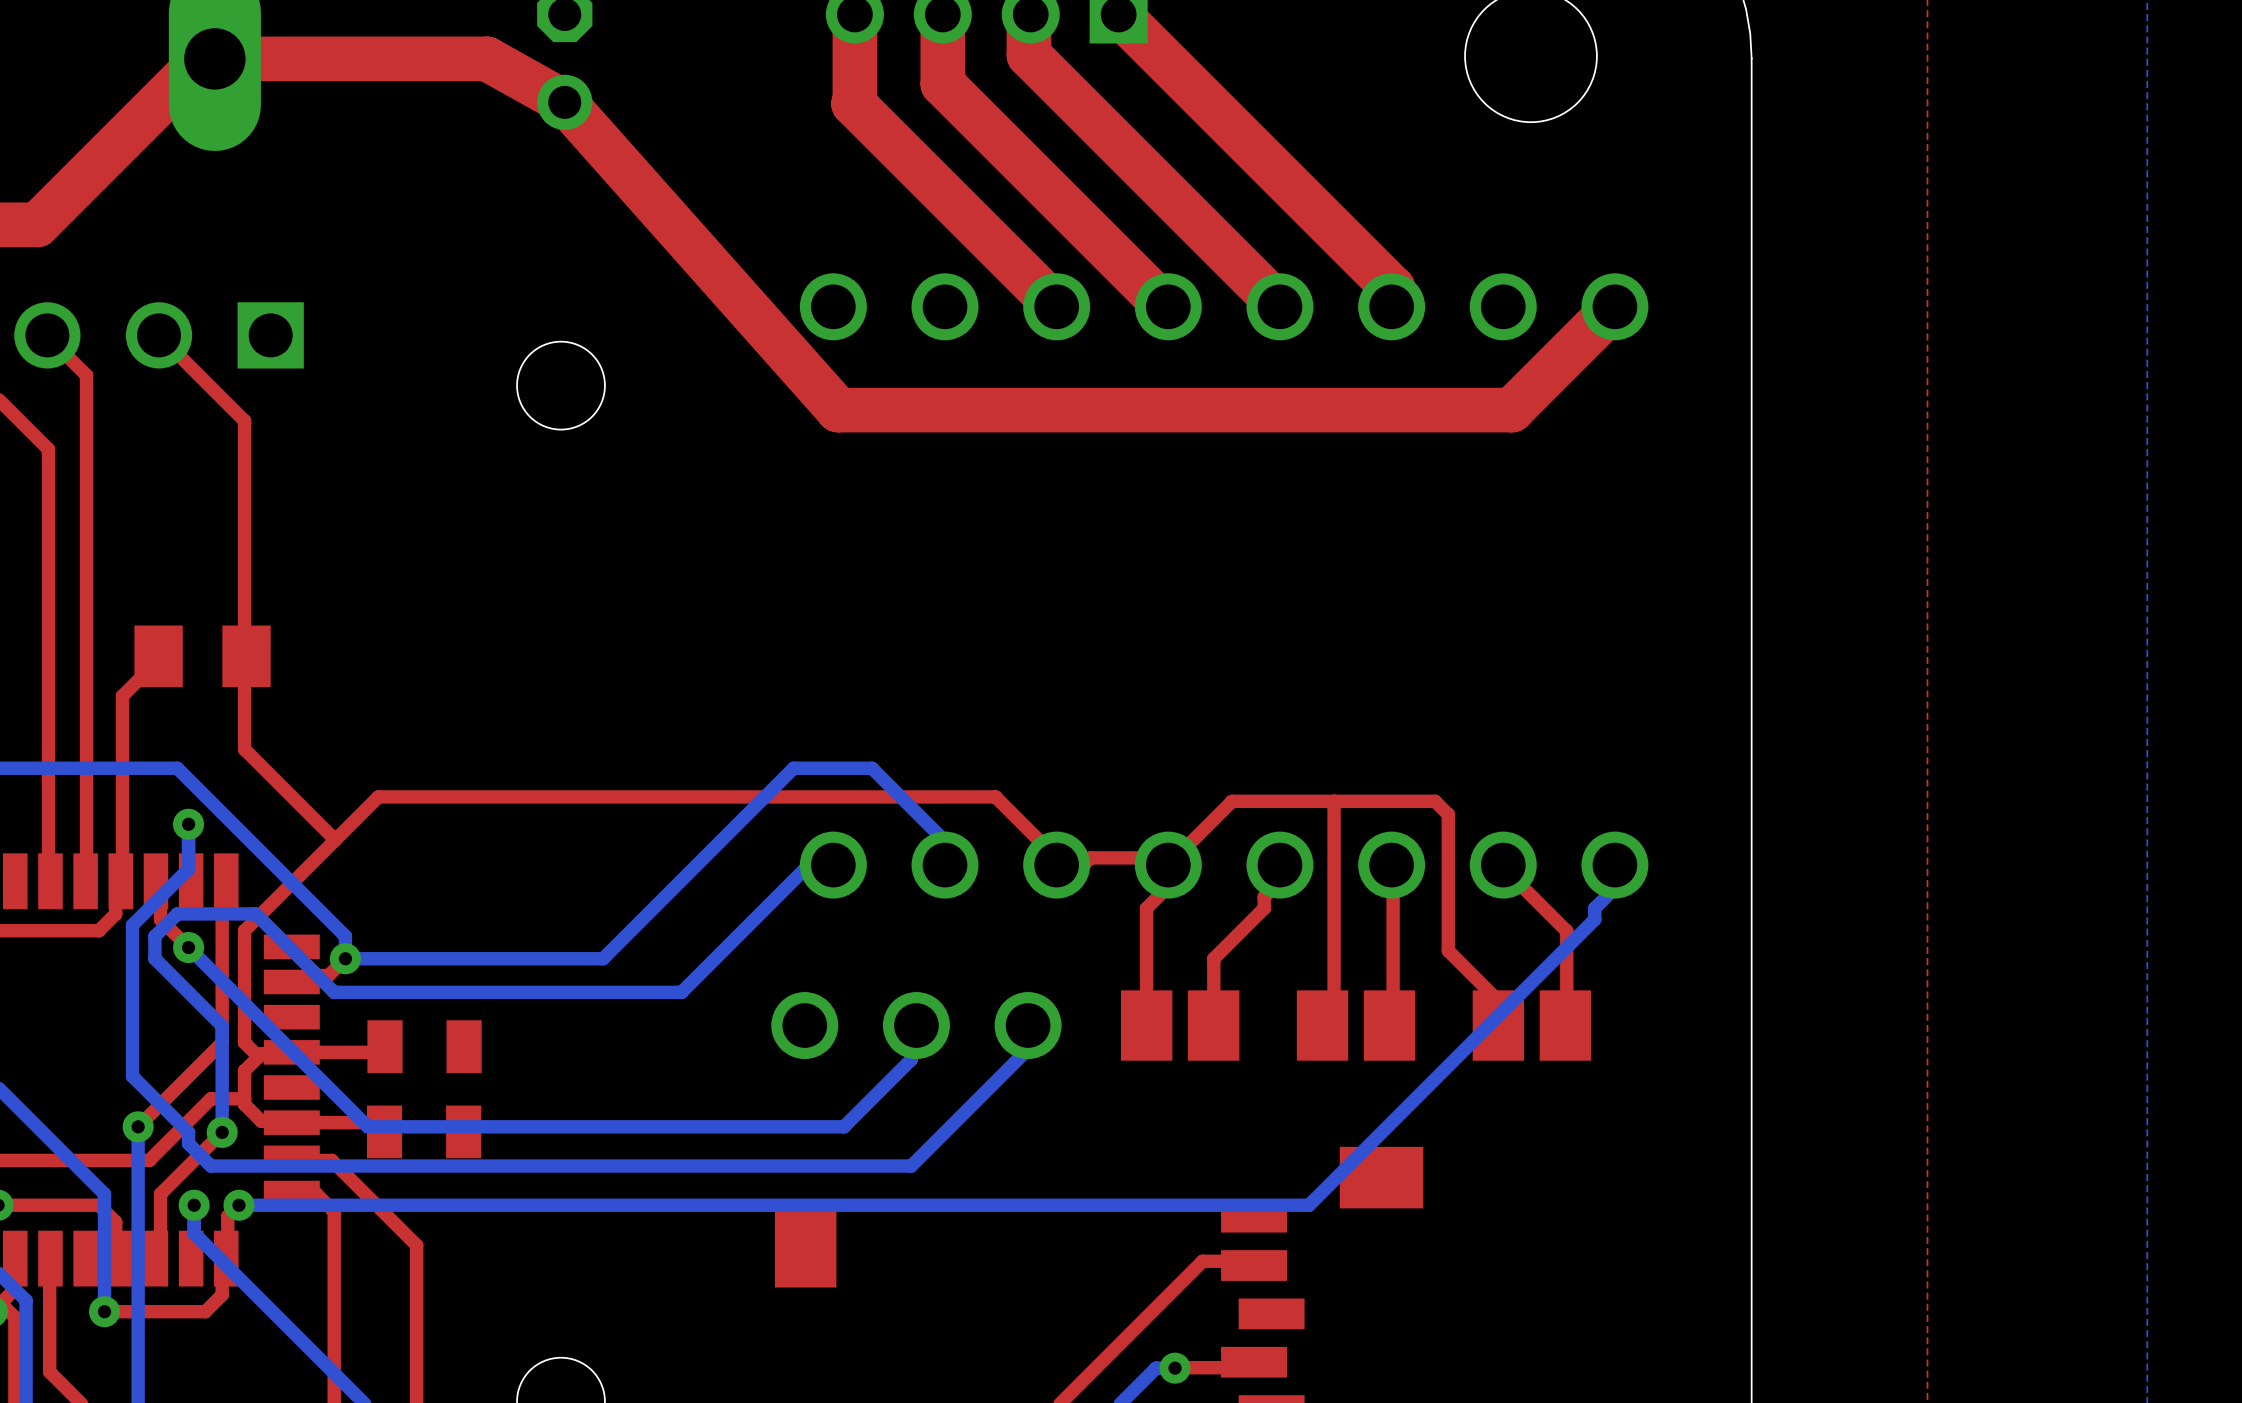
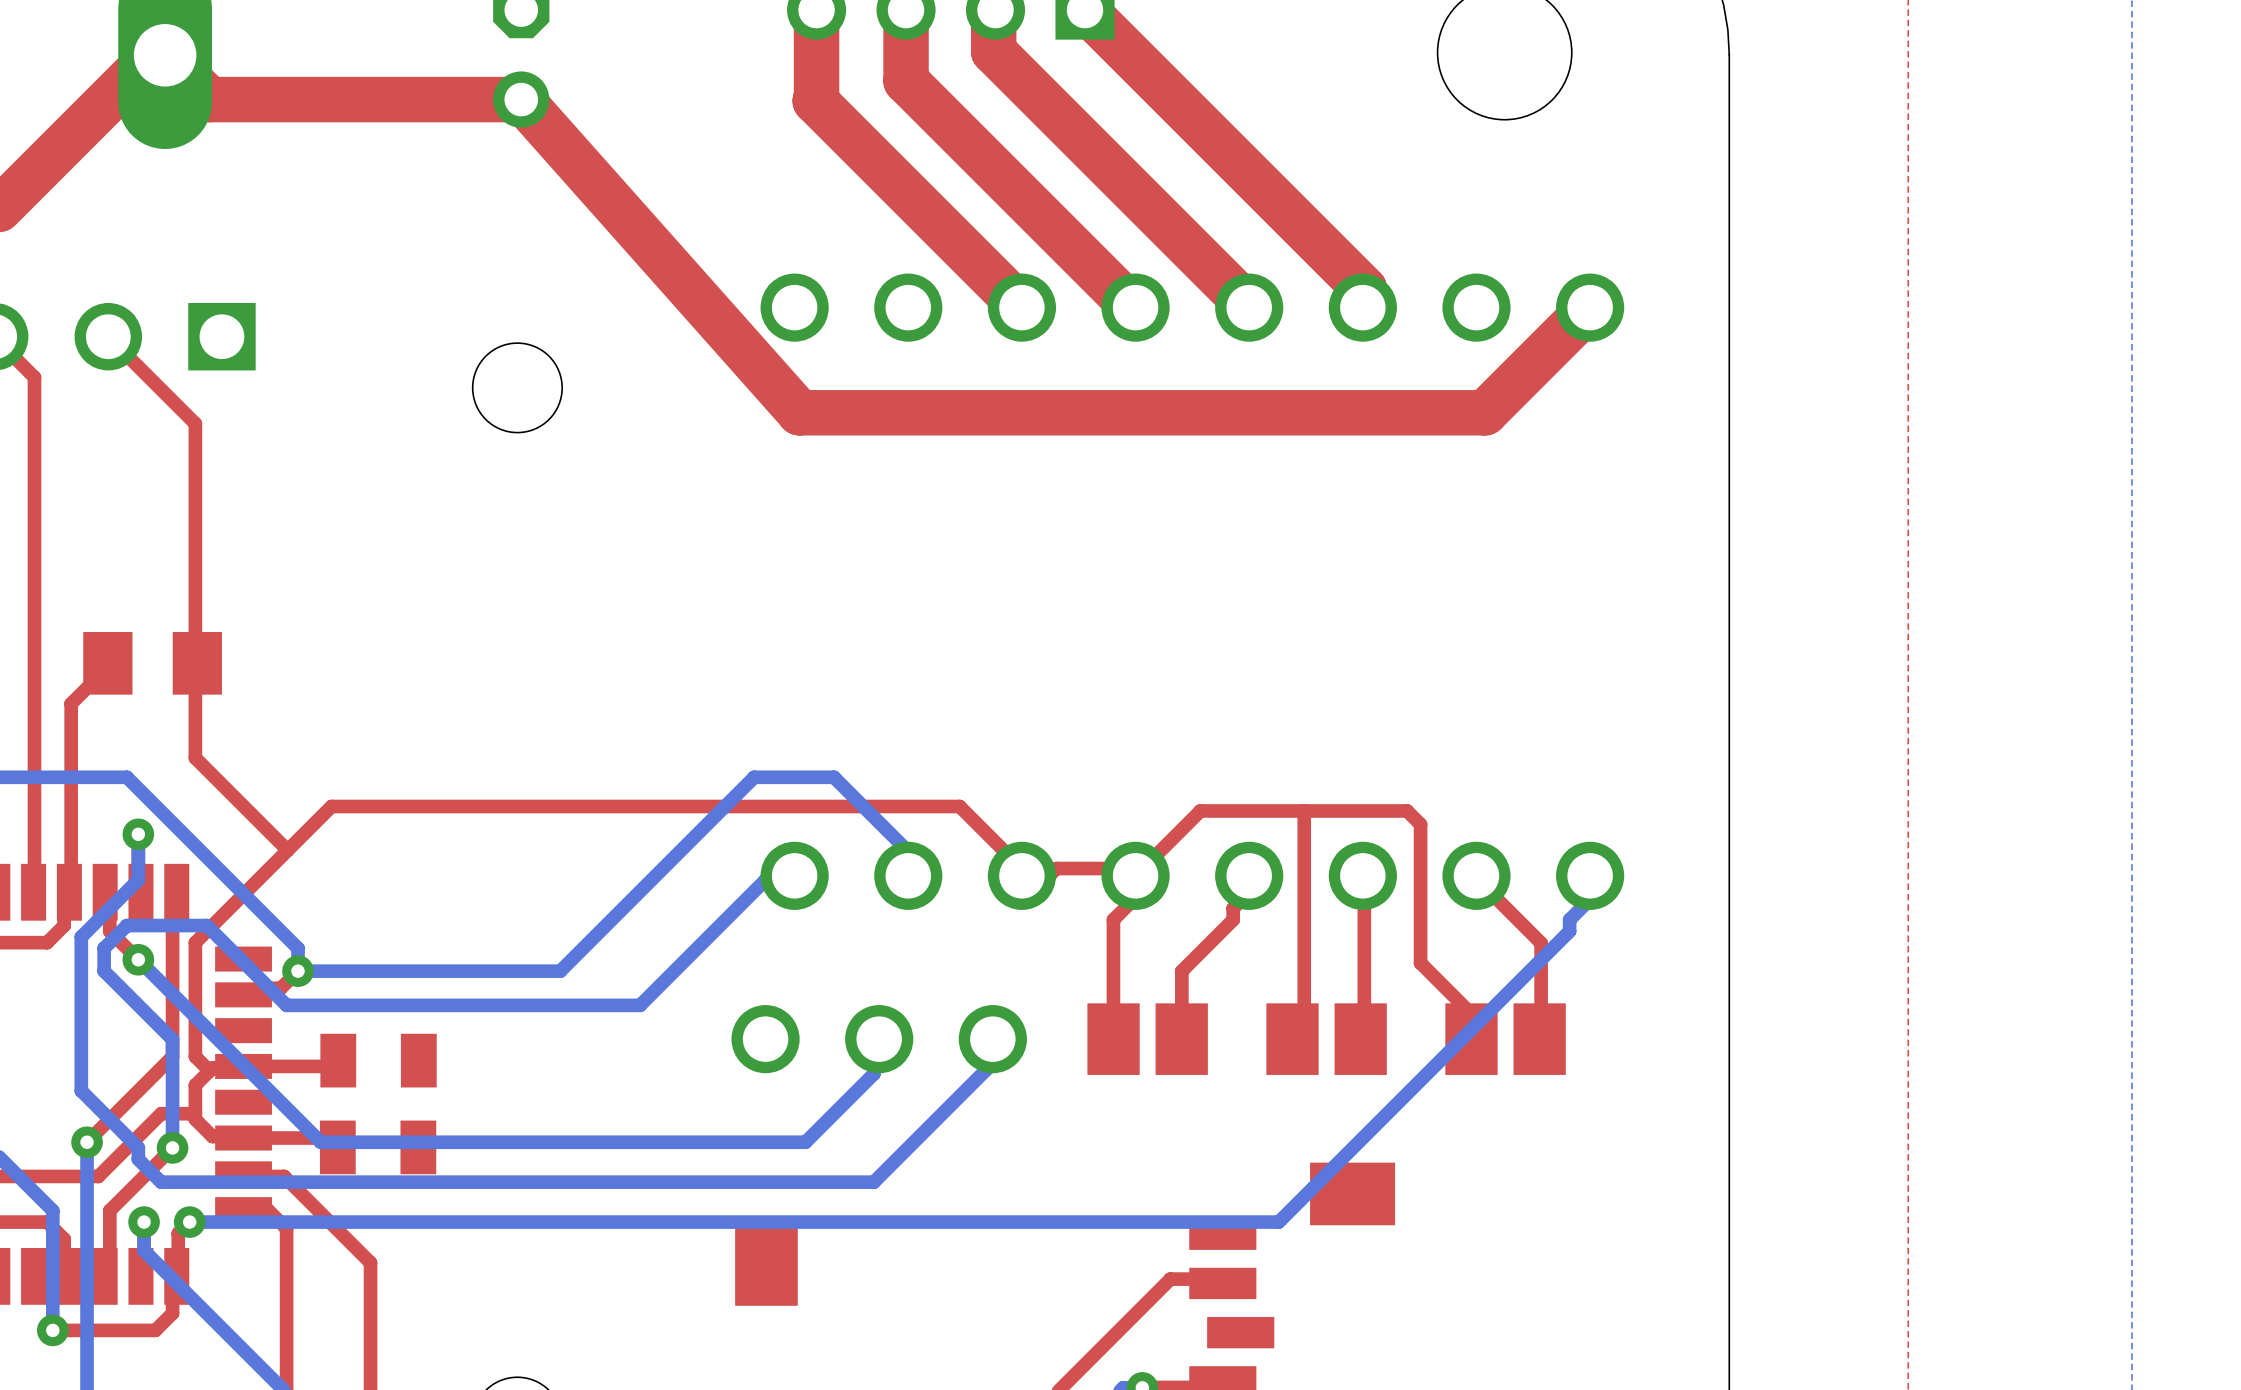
top track: (214, 58) (487, 58) (564, 102) -> (155, 58) (158, 55) (165, 55) (209, 99) (521, 99)

